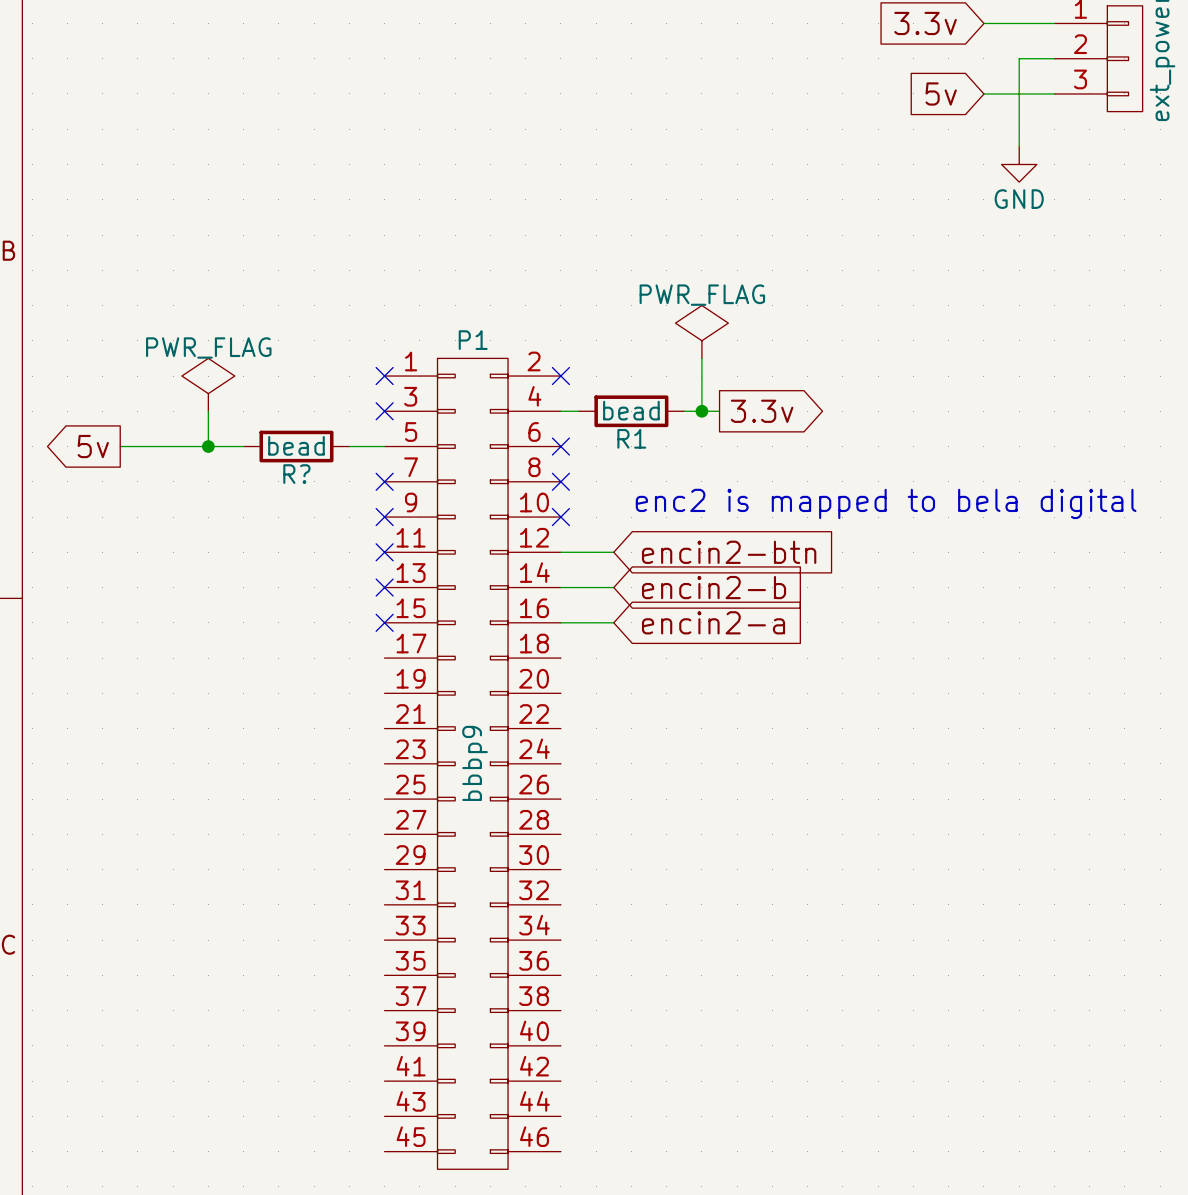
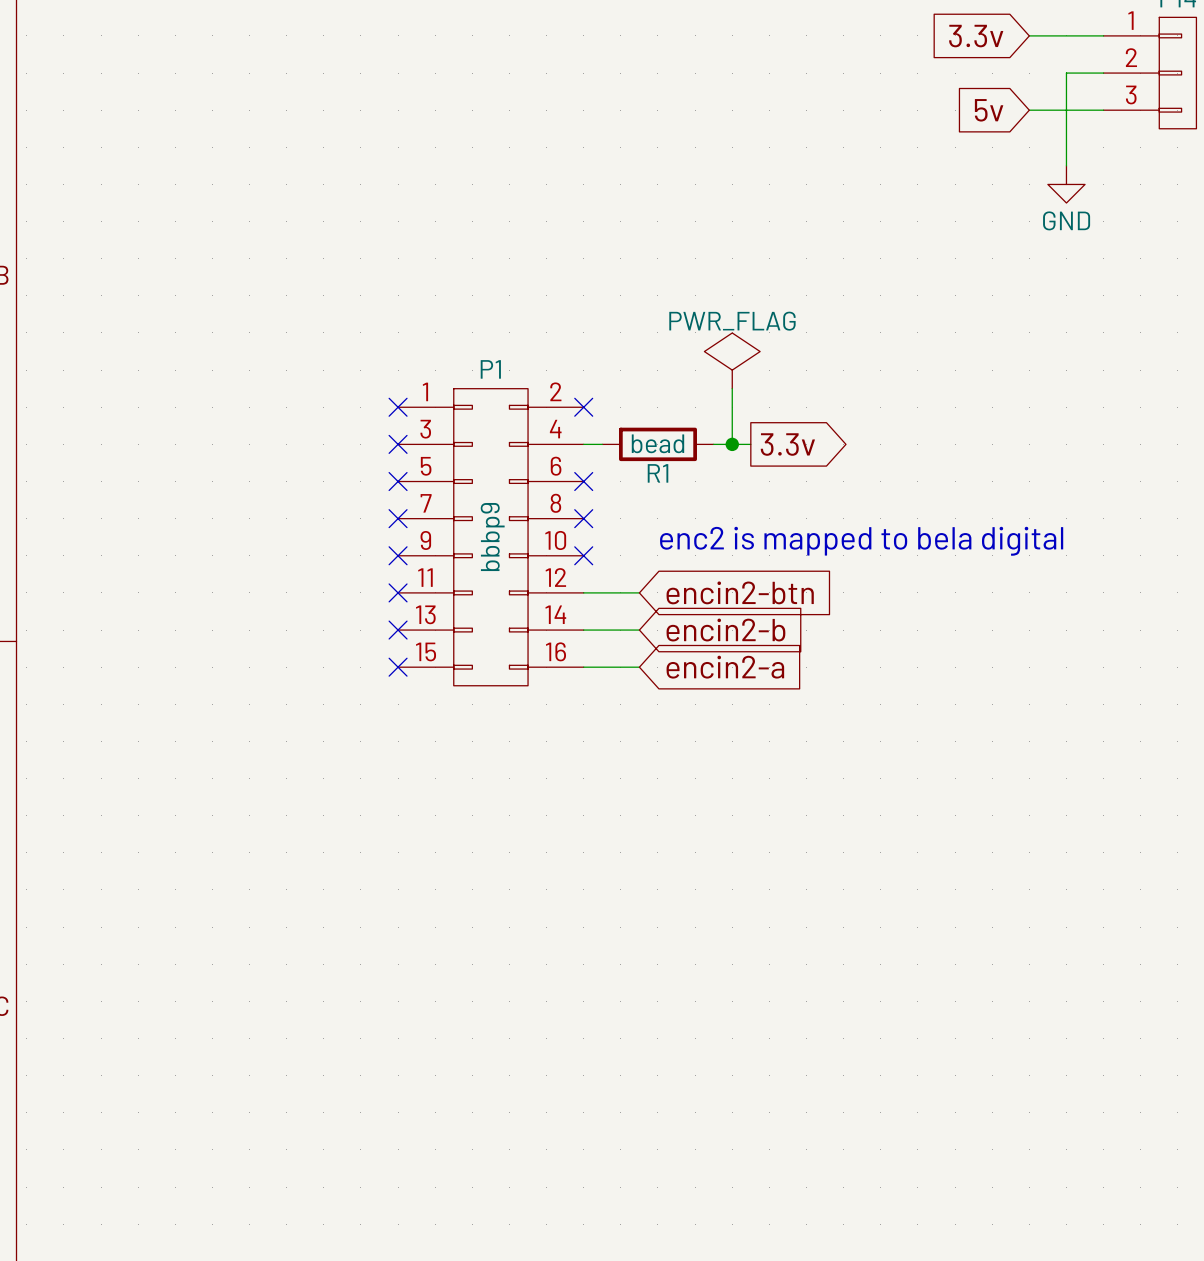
P1 symbol: [384, 358, 561, 1170] -> [398, 388, 584, 686]
power symbol: PWR_FLAG (208, 384) -> none
wire: (208, 411) (208, 446) -> none
global label: 5v (93, 446) -> none
wire: (120, 446) (243, 446) -> none
junction: (208, 446) -> none
R?: bead (296, 446) -> none
wire: (349, 446) (384, 446) -> none
no-connect mark: none -> (398, 481)

